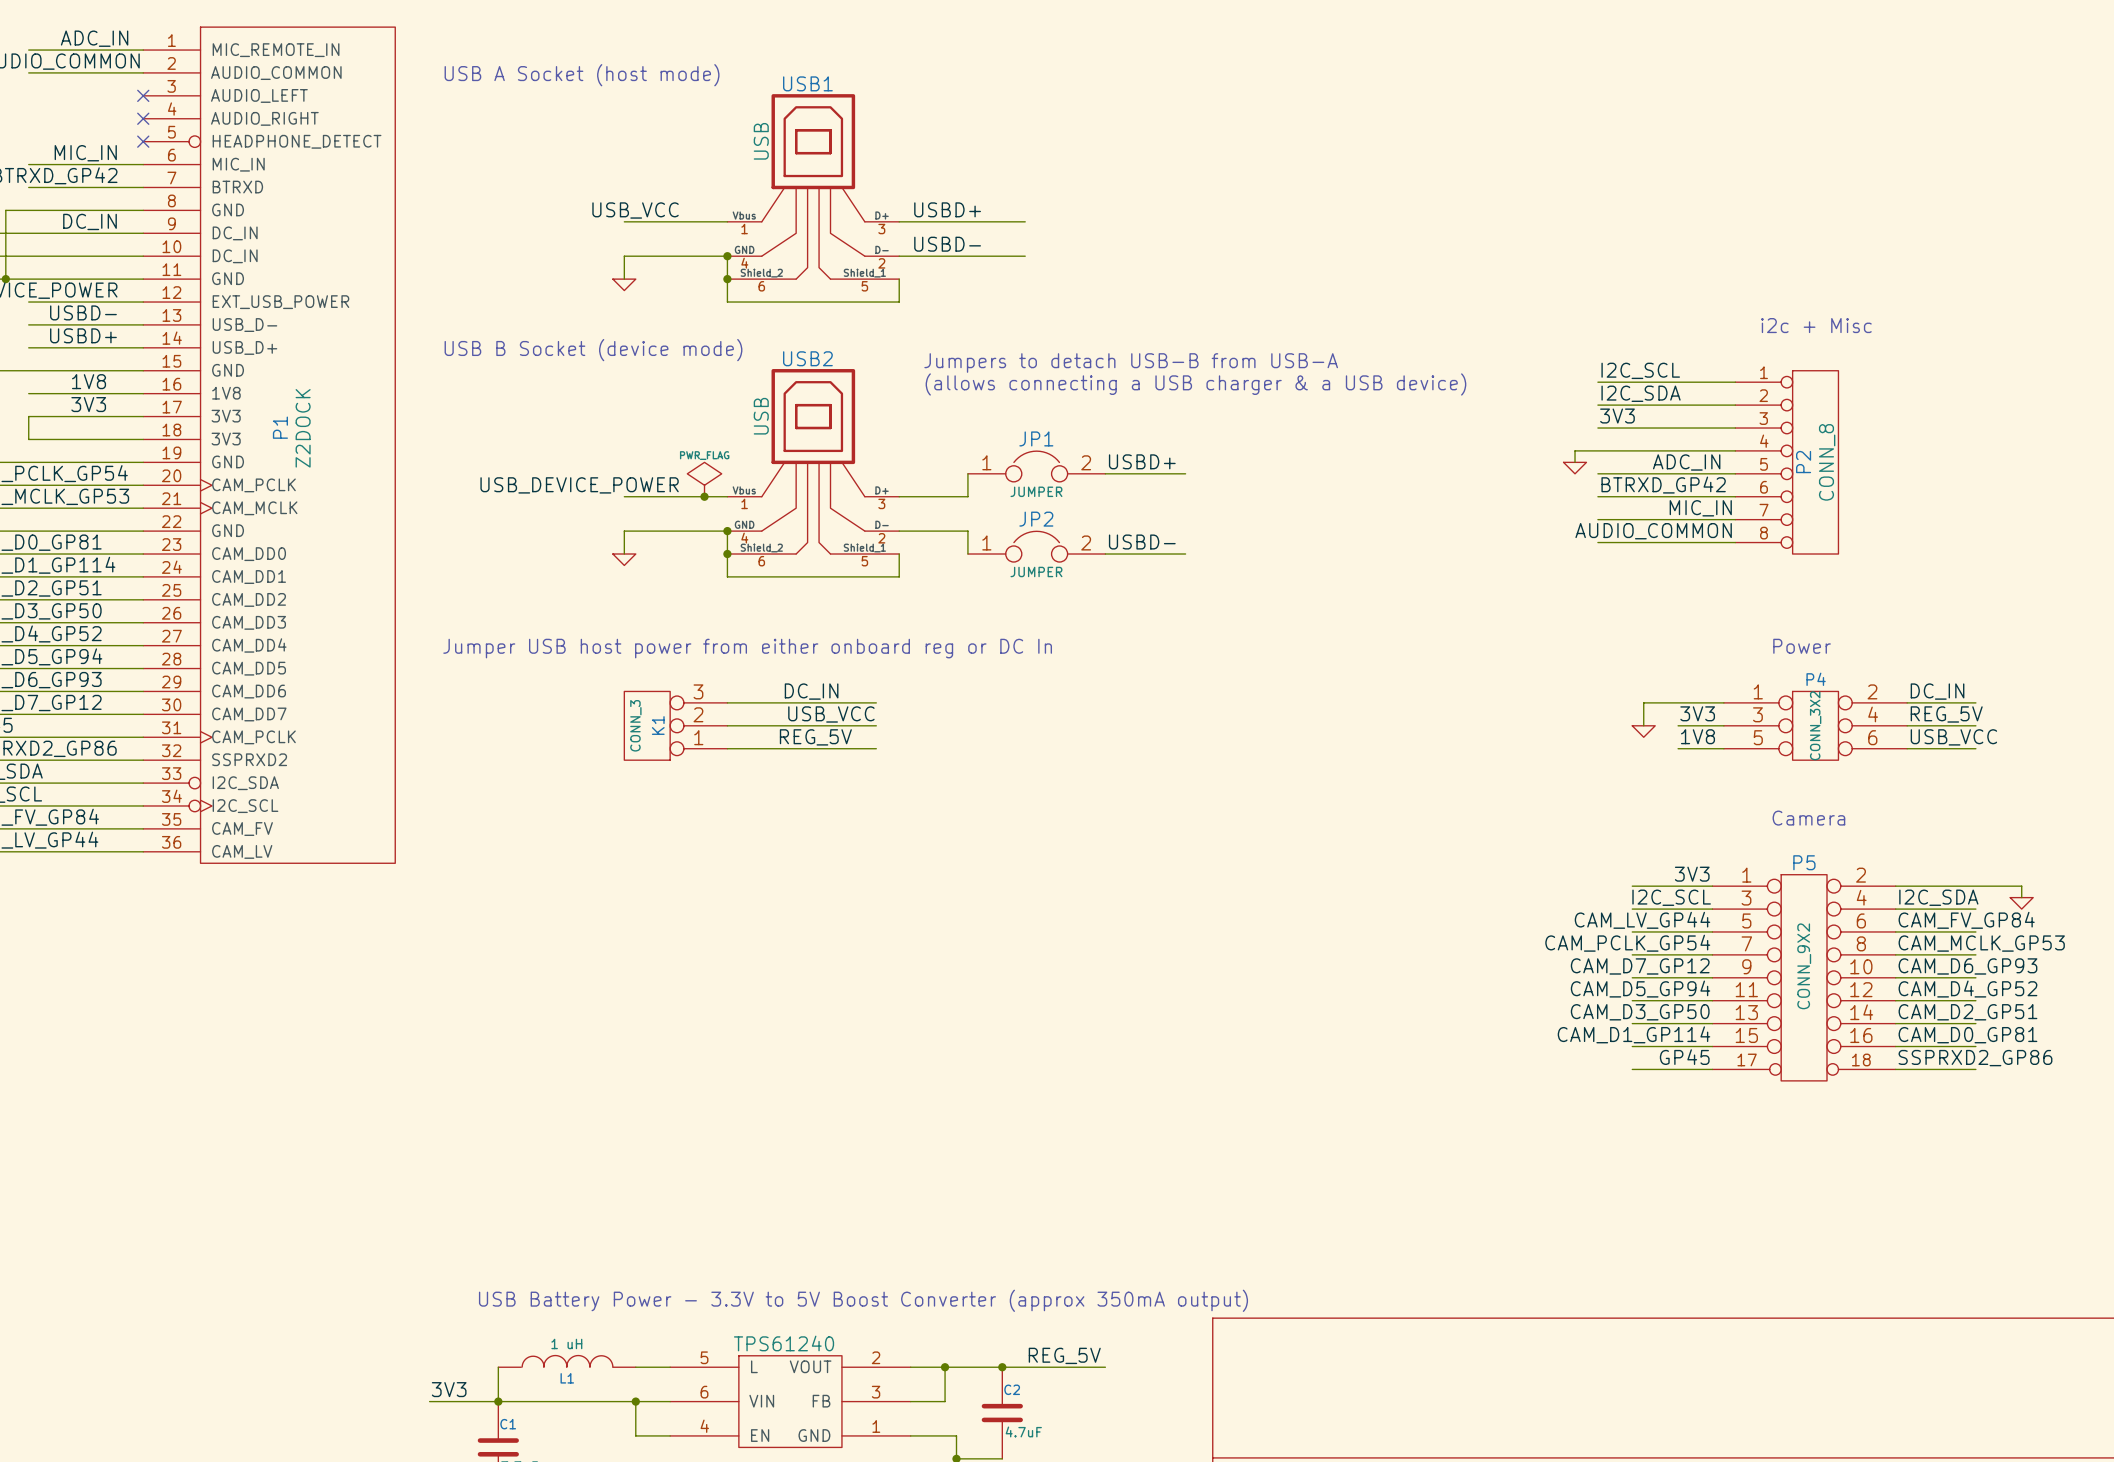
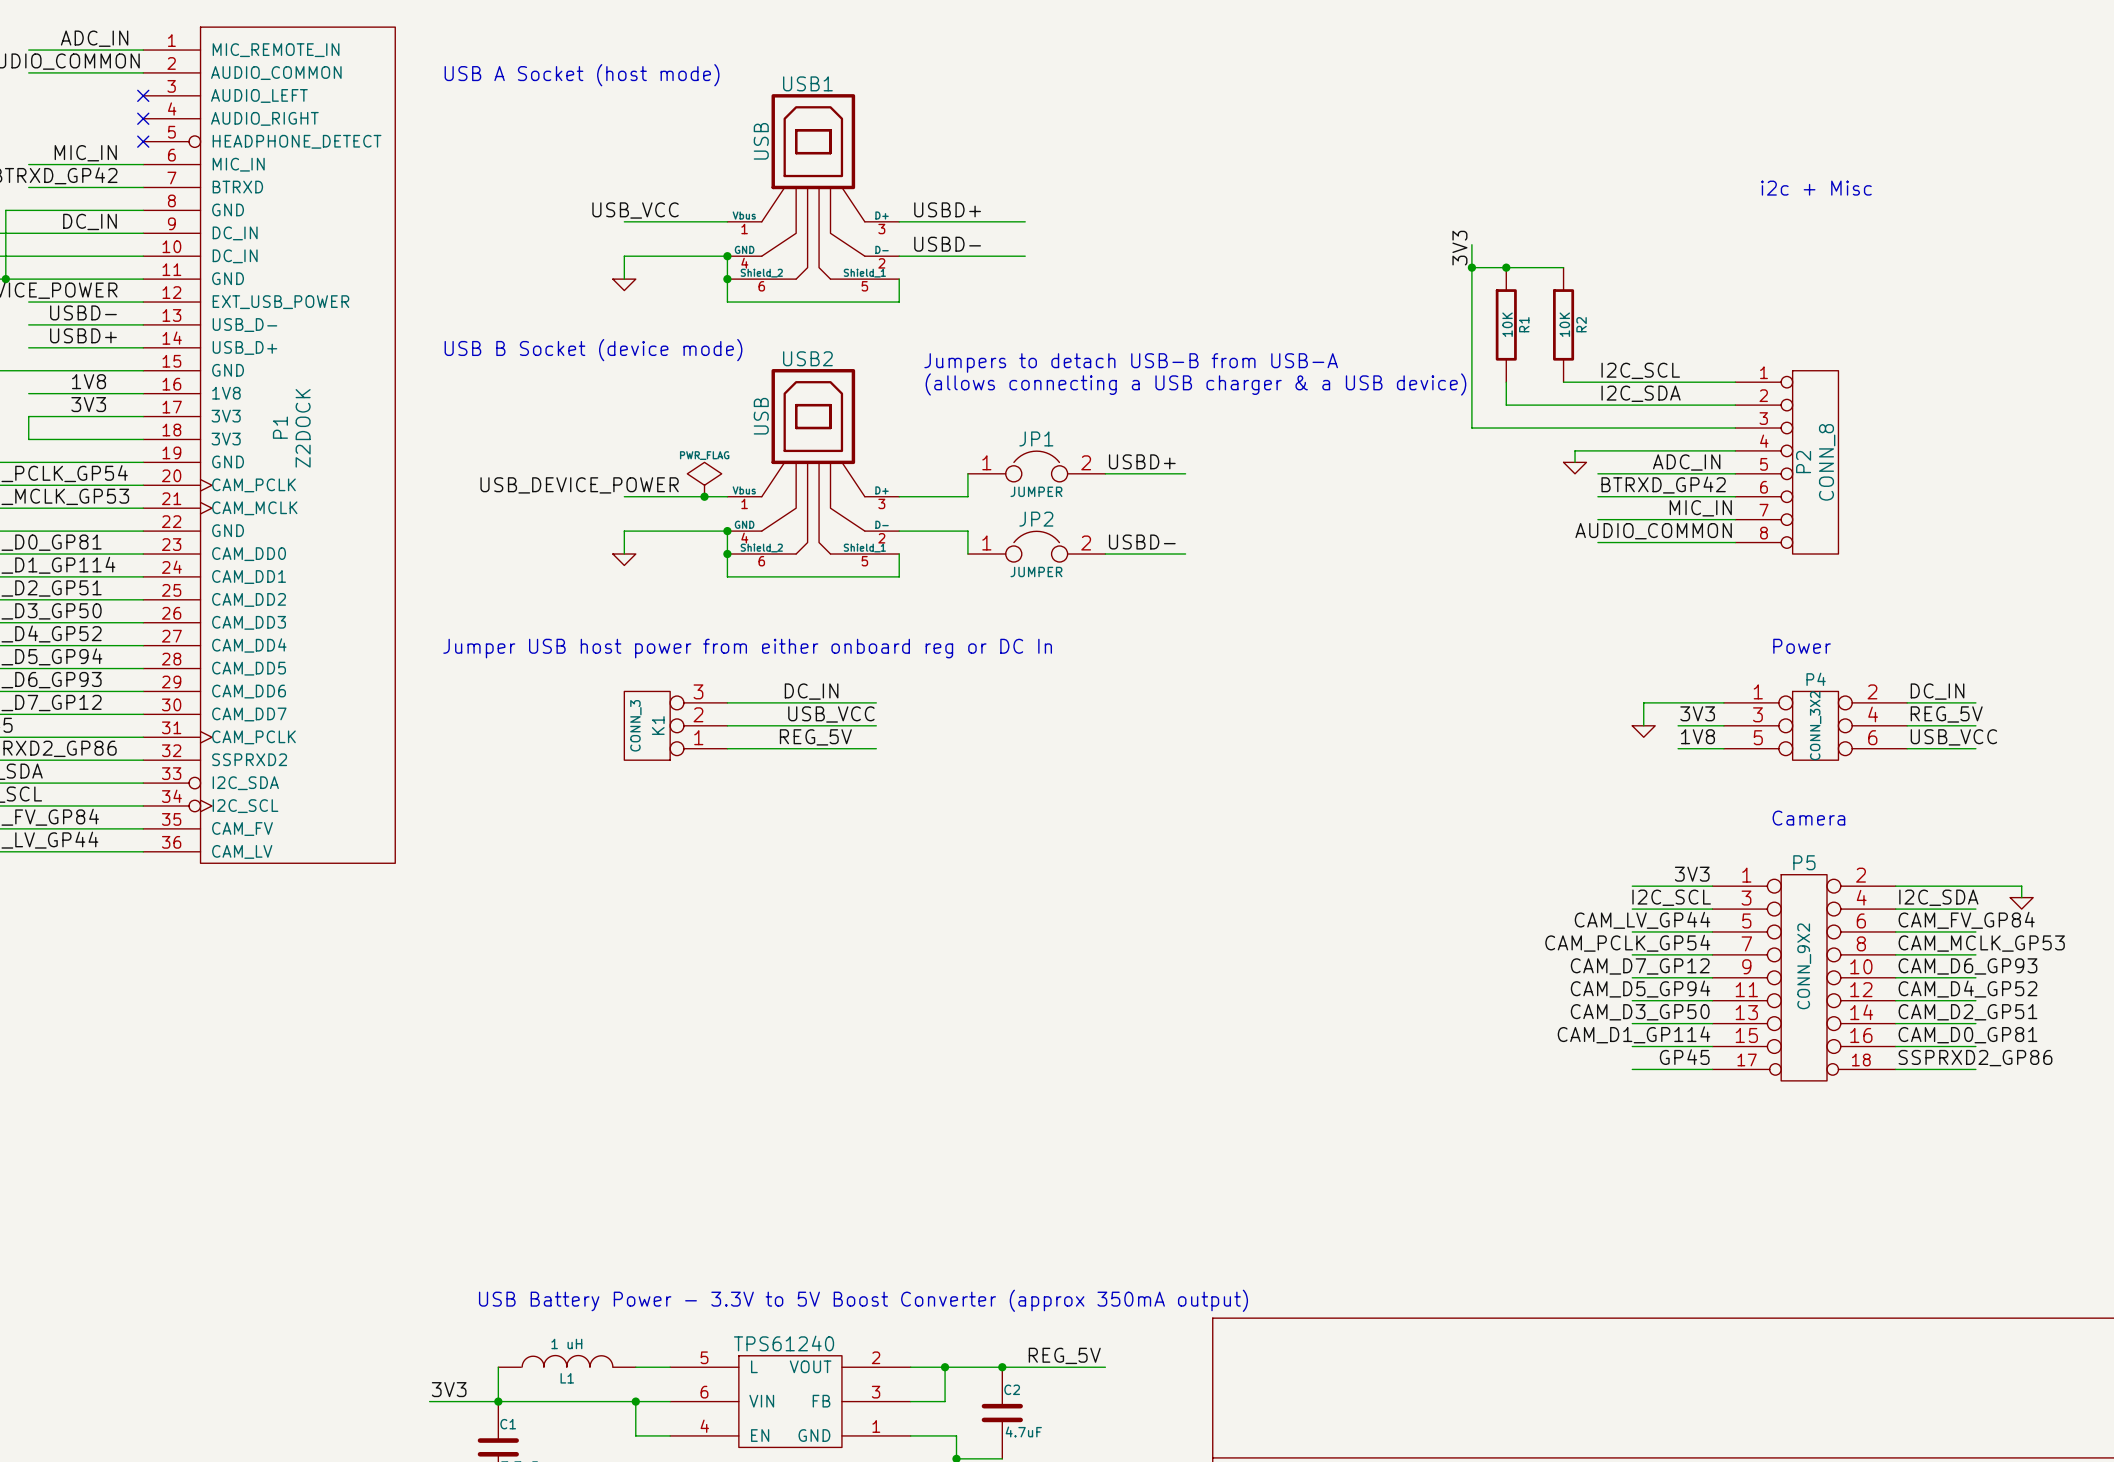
wire: none -> (1471, 244) (1471, 428) (1597, 428)
wire: none -> (1471, 267) (1563, 267)
junction: none -> (1471, 267)
junction: none -> (1506, 267)
R1: none -> 10K (1506, 324)
R2: none -> 10K (1563, 324)
text position: i2c + Misc (1816, 325) -> i2c + Misc (1816, 188)
wire: none -> (1506, 382) (1506, 405) (1597, 405)
wire: none -> (1563, 382) (1597, 382)
label rotation: 0° (1617, 416) -> 90° counterclockwise (1459, 248)
label position: 3V3 (1617, 416) -> 3V3 (1459, 248)

